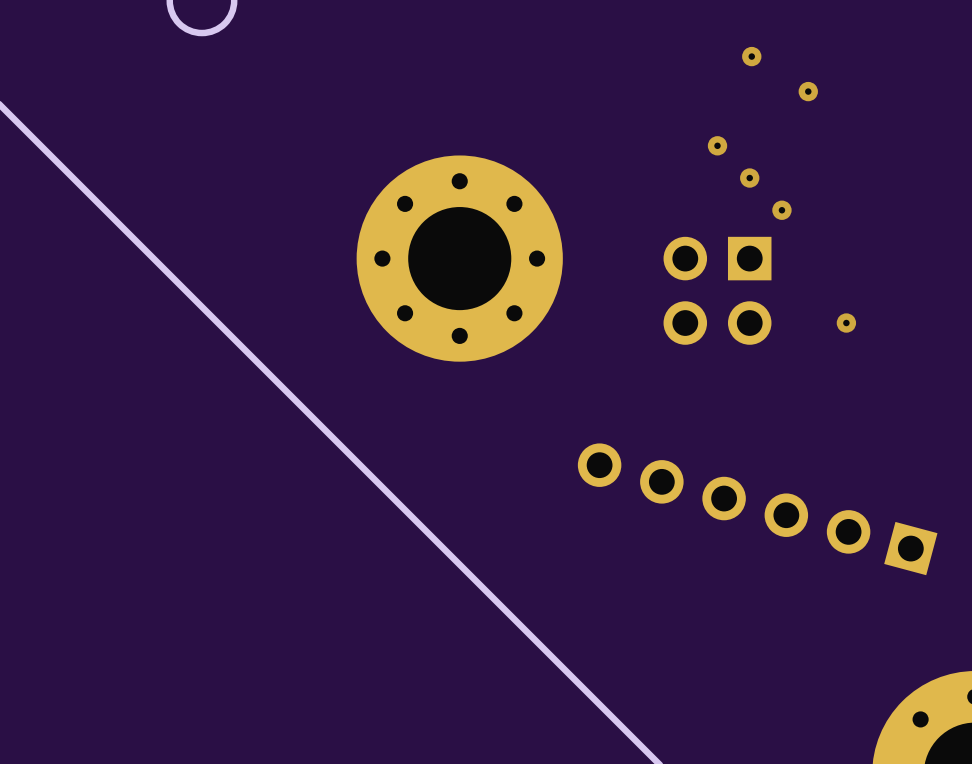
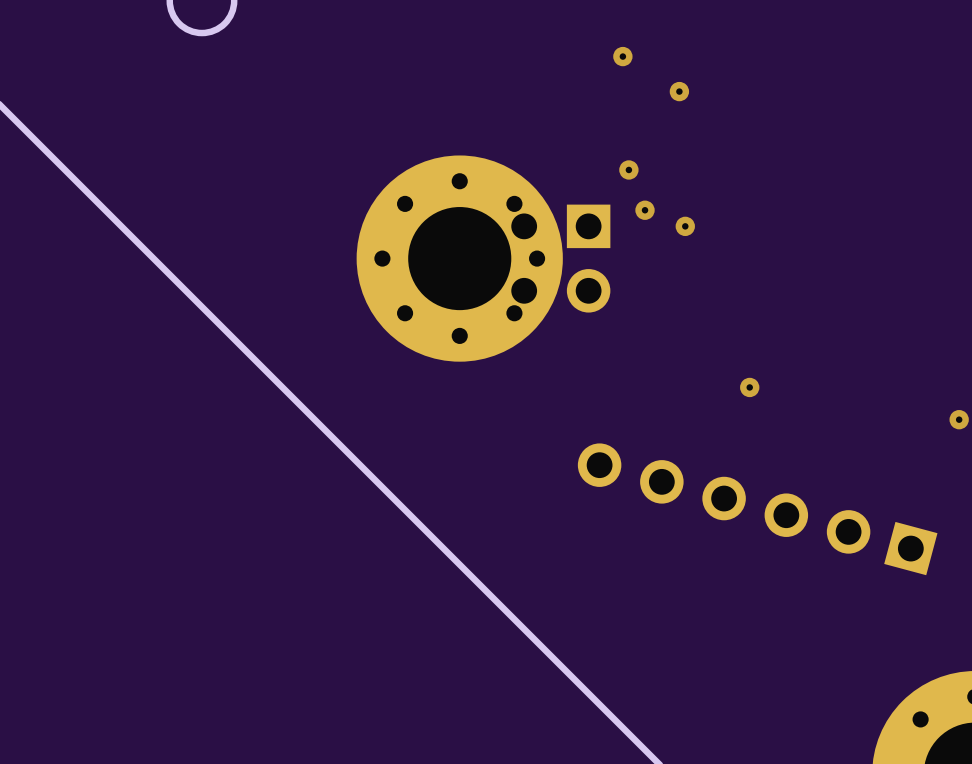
via: none -> (622, 56)
via: (751, 56) -> none
via: none -> (679, 91)
via: (808, 91) -> none
via: (717, 145) -> none
via: none -> (628, 169)
via: (749, 178) -> none
via: none -> (645, 210)
via: (781, 210) -> none
via: none -> (685, 226)
part position: (717, 290) -> (556, 258)
via: (846, 323) -> none
via: none -> (749, 387)
via: none -> (959, 419)

